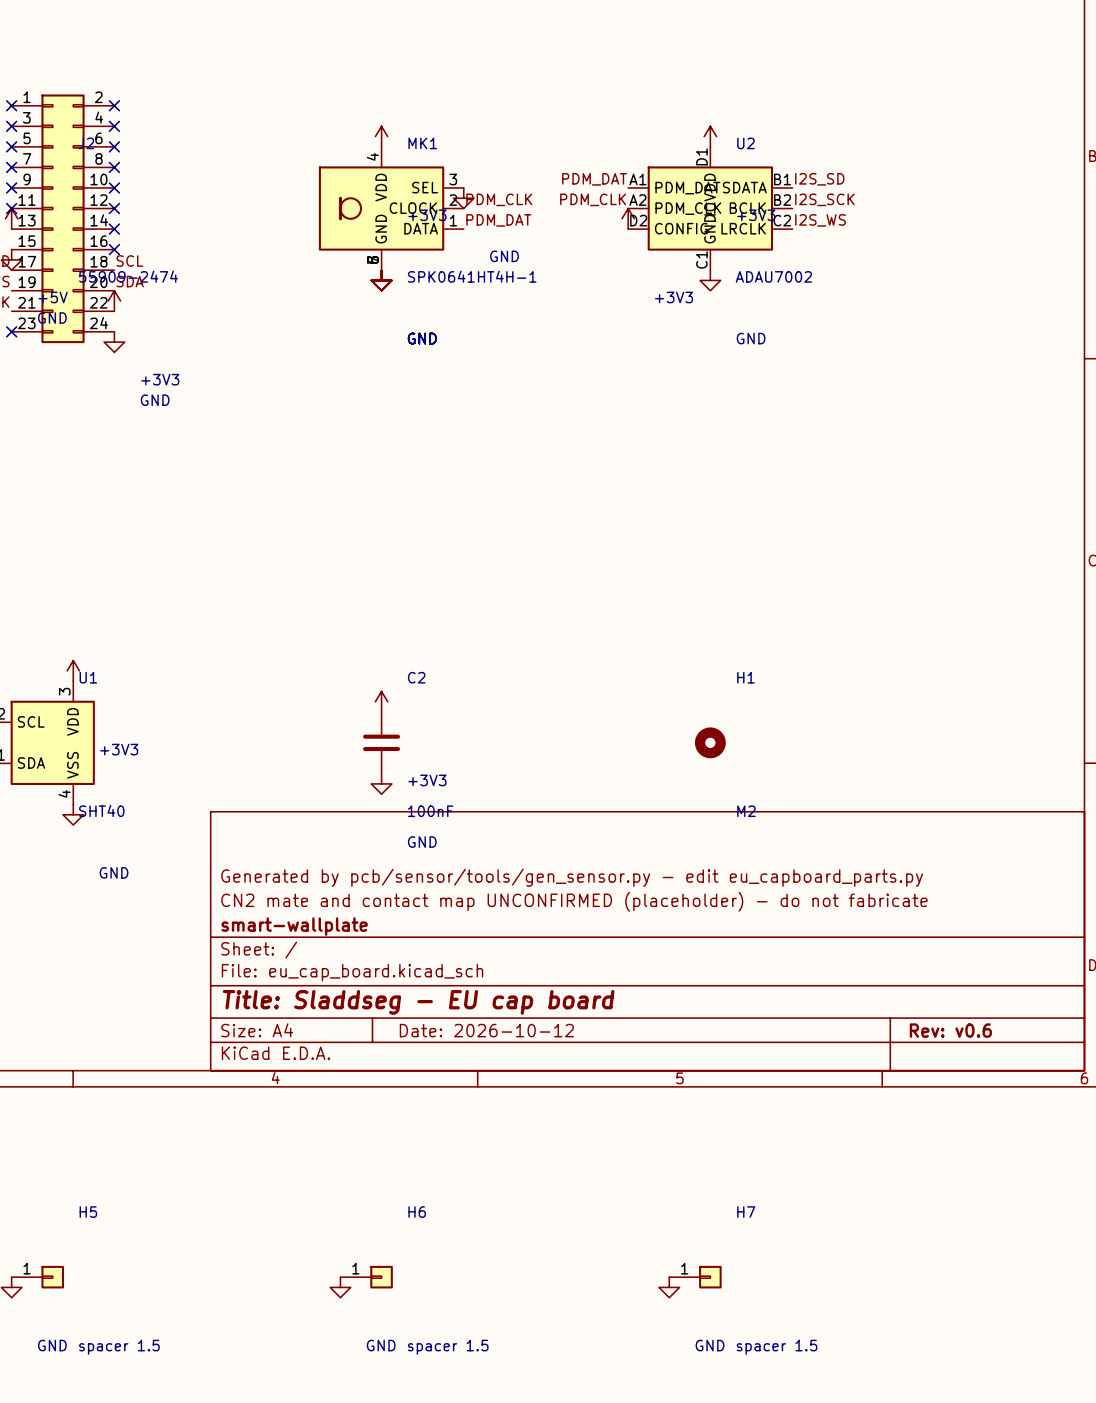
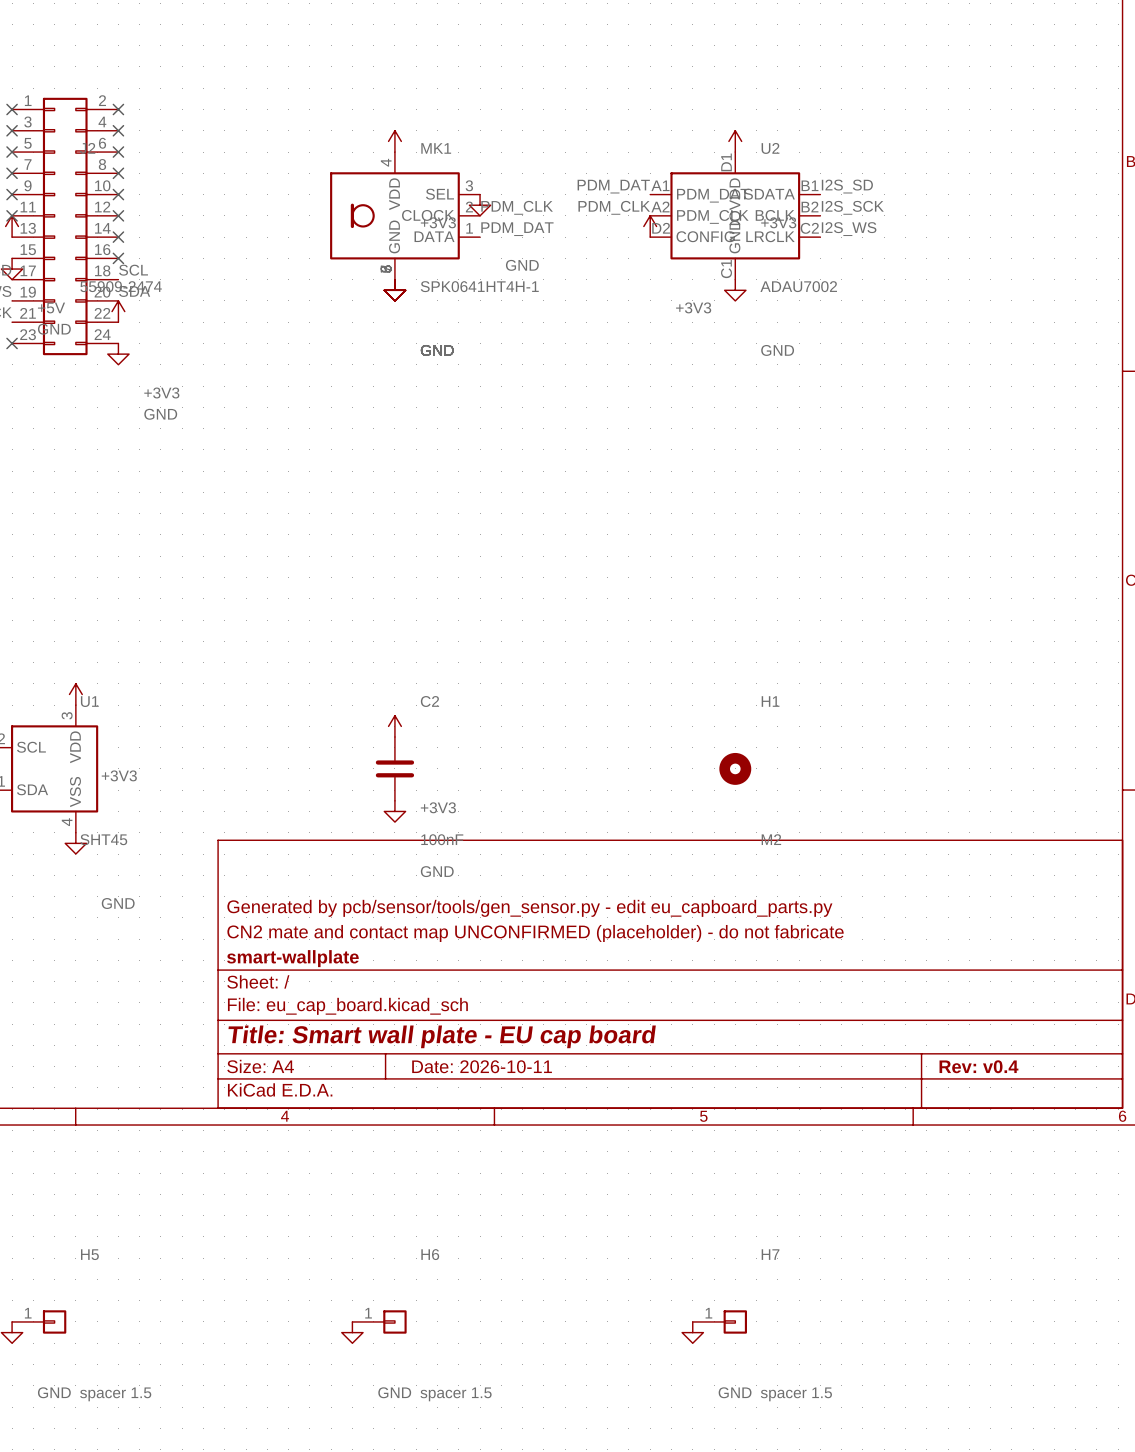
U1 value: SHT40 (101, 810) -> SHT45 (103, 839)
title block: Title: Sladdseg - EU cap board (418, 1002) -> Title: Smart wall plate - EU cap board (442, 1036)
title block: Date: 2026-10-12 (486, 1030) -> Date: 2026-10-11 (482, 1066)
title block: Rev: v0.6 (950, 1030) -> Rev: v0.4 (978, 1066)

